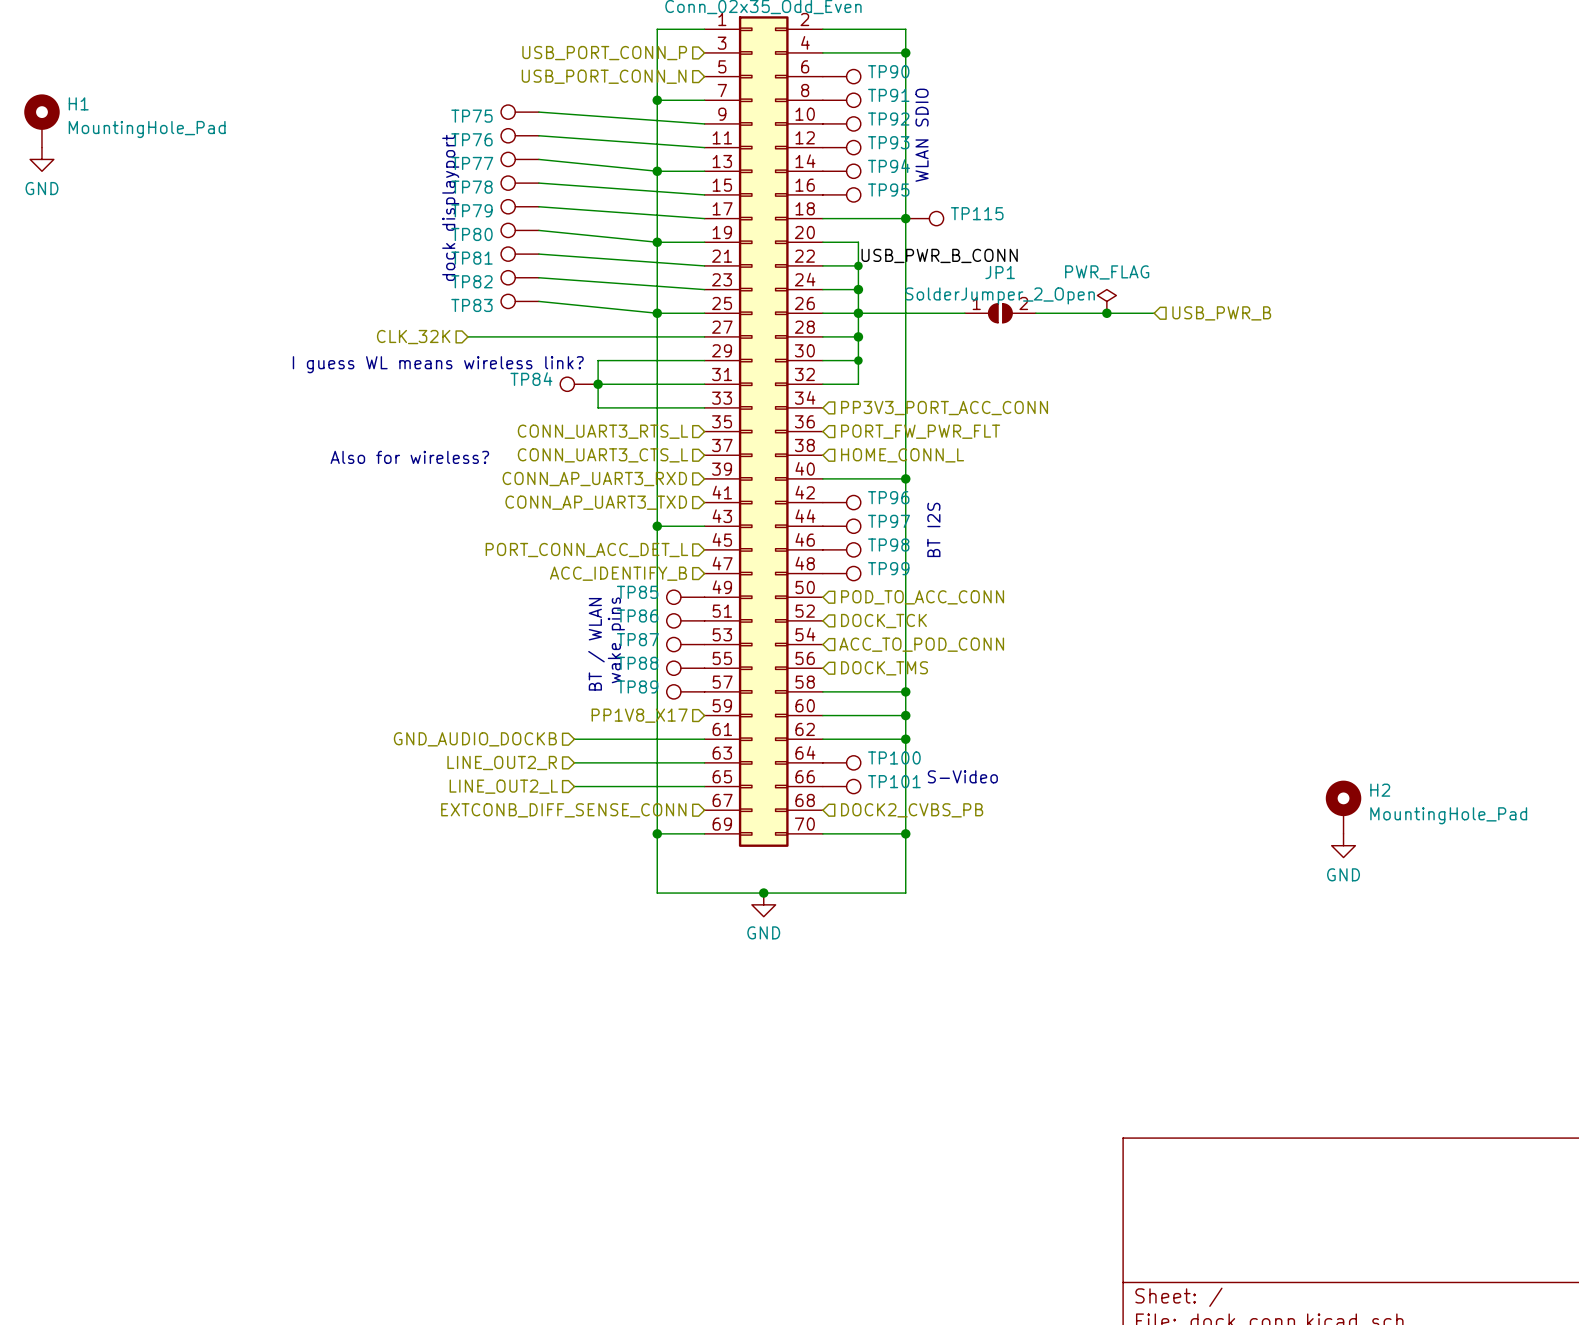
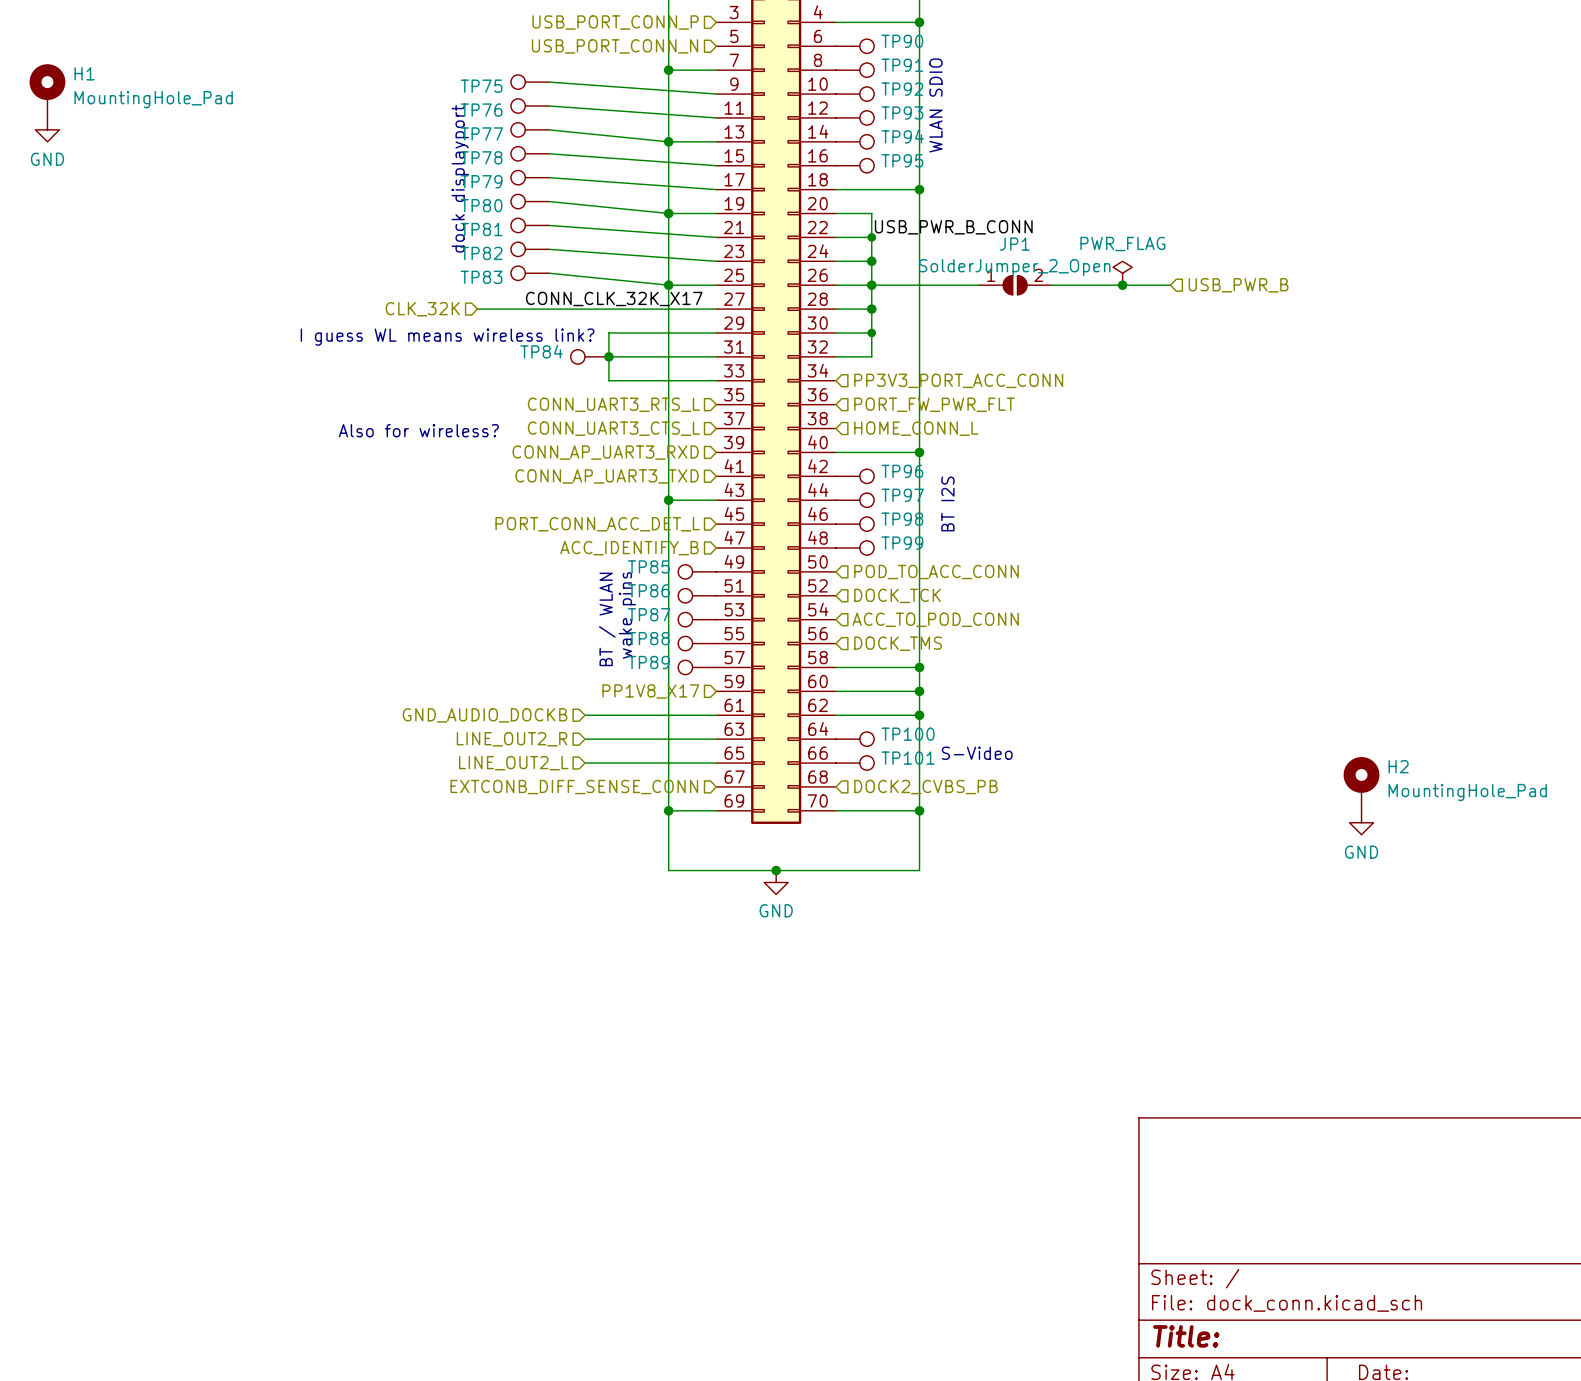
TP115: (924, 218) -> none
label: none -> CONN_CLK_32K_X17 (614, 298)

